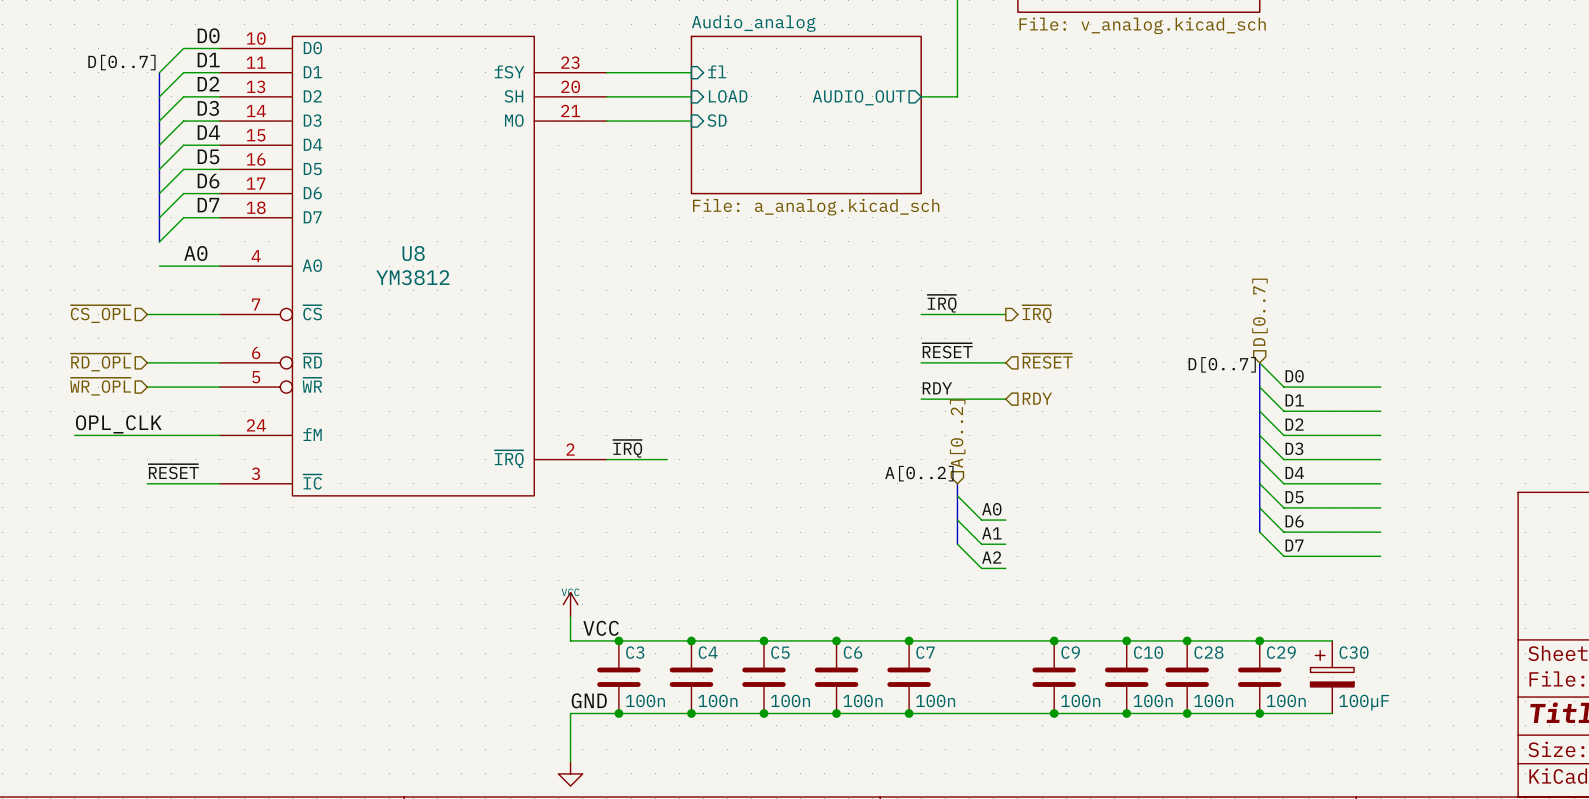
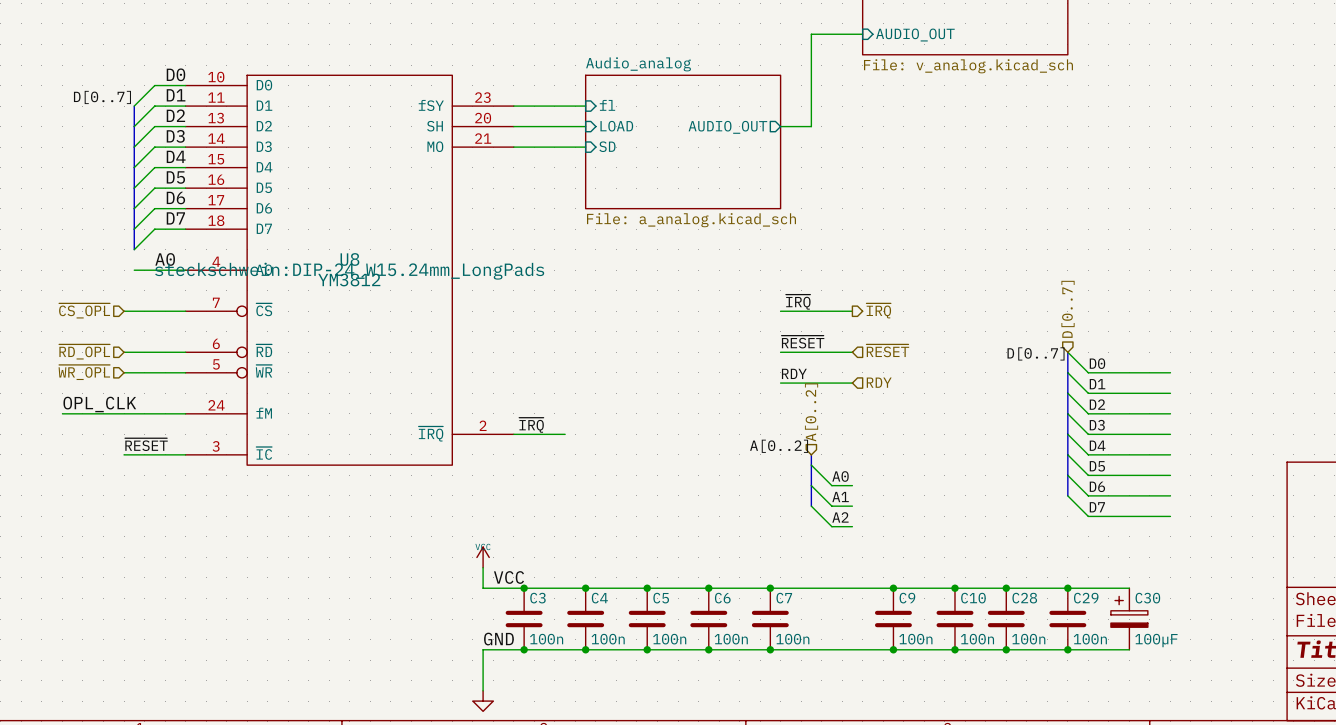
U8 text: none -> steckschwein:DIP-24_W15.24mm_LongPads (349, 271)

